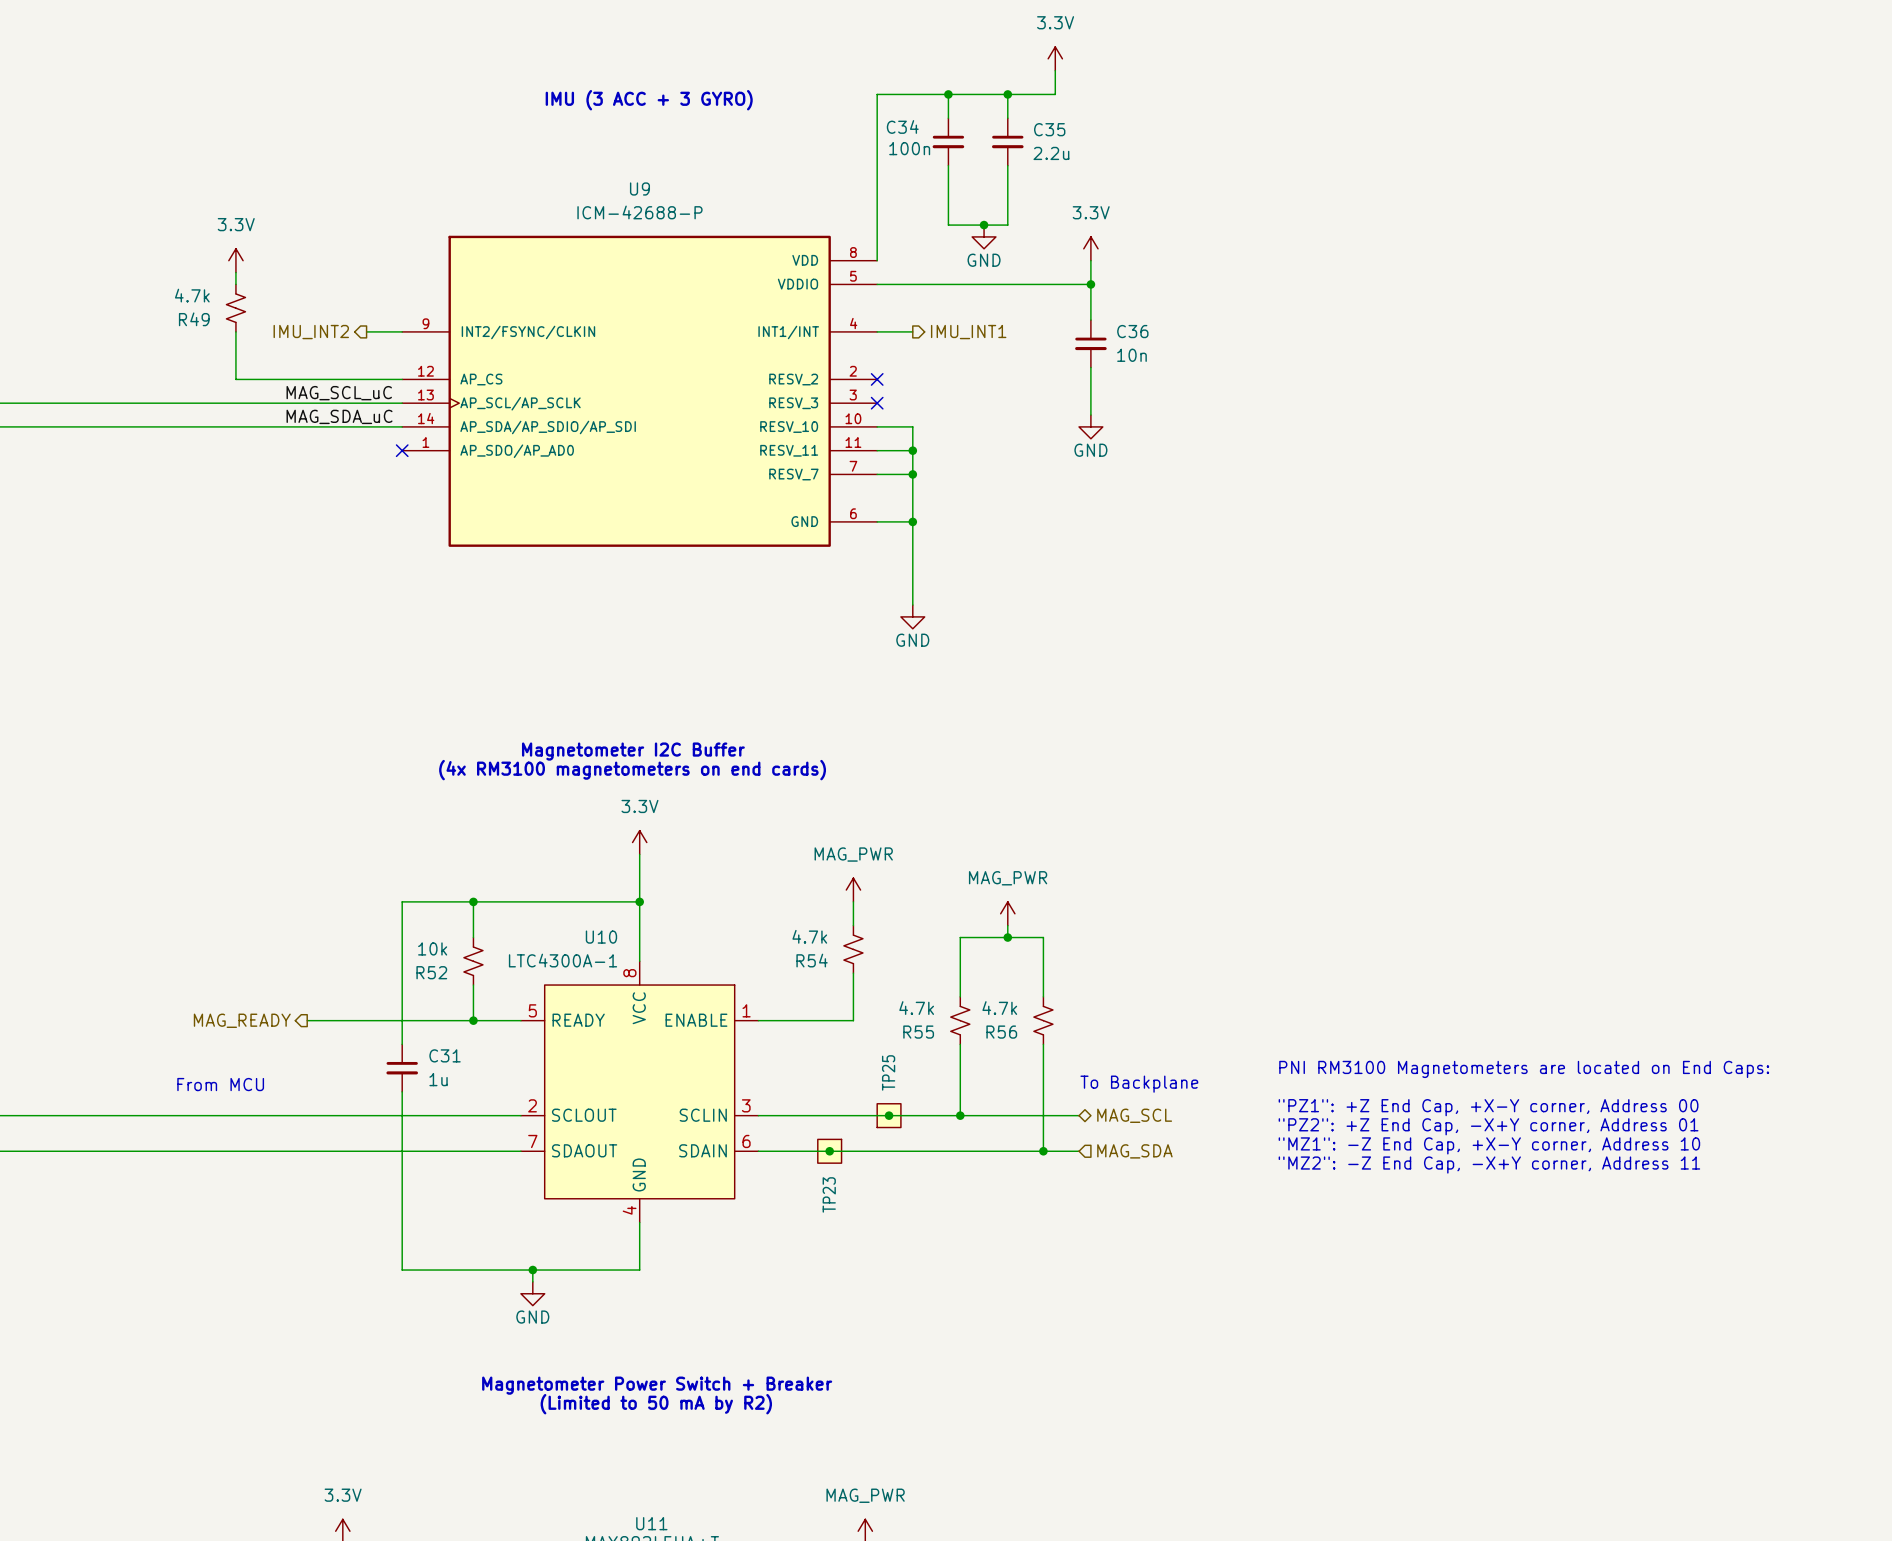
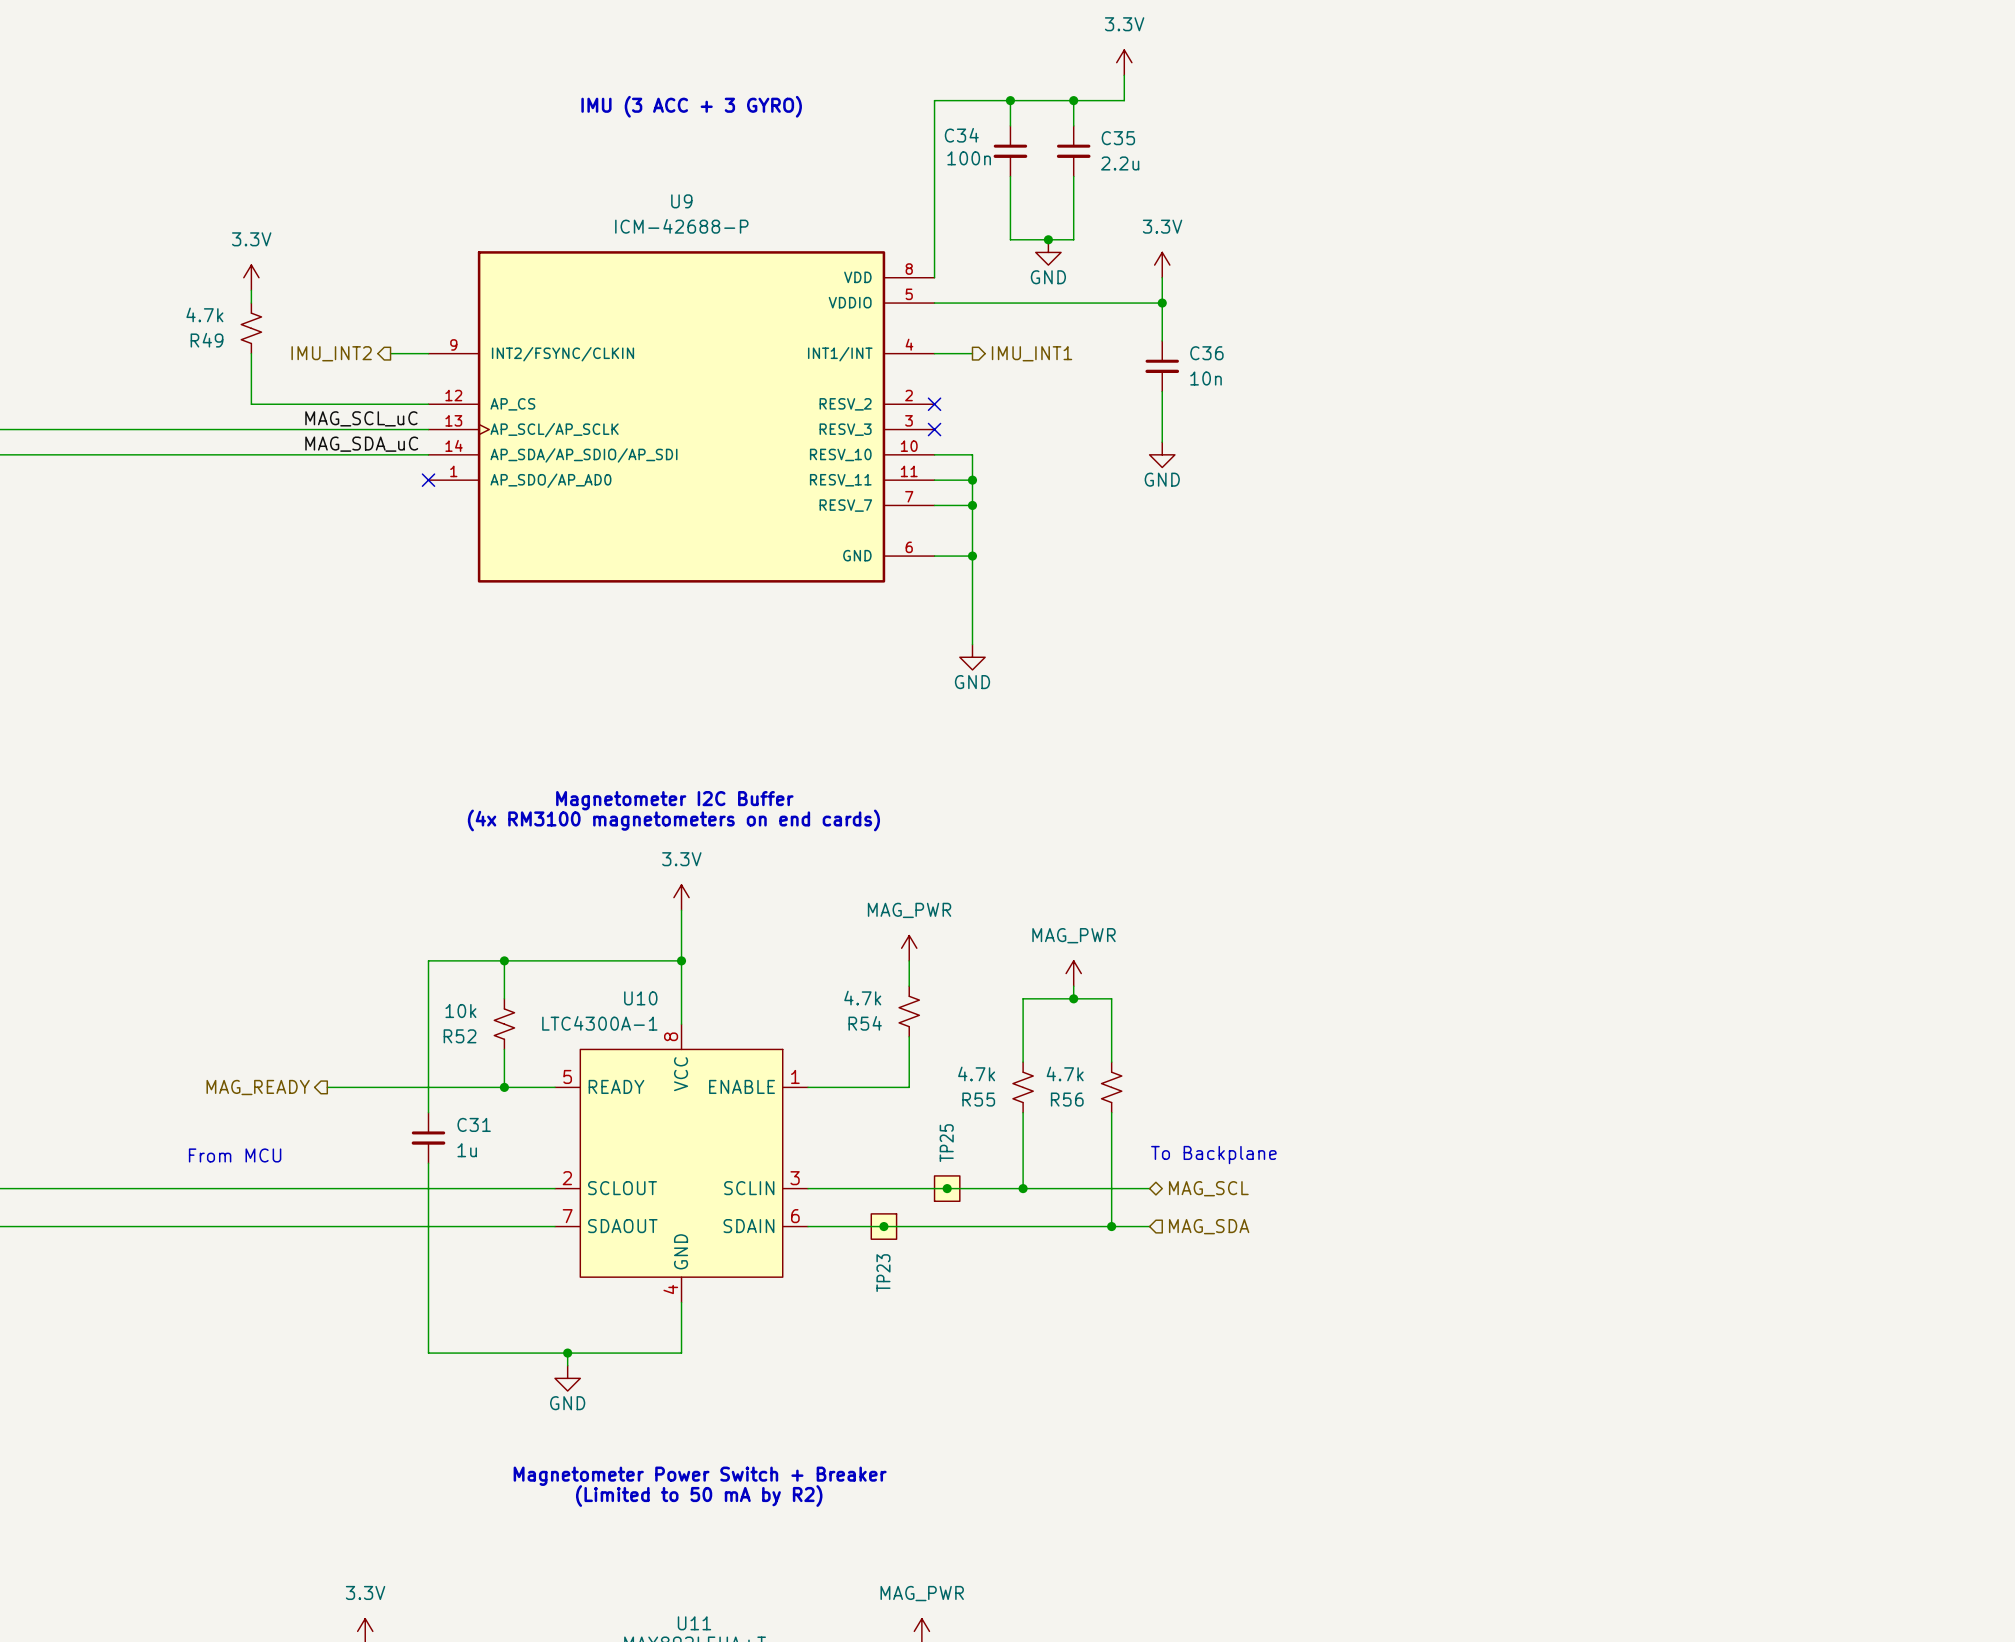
text: PNI RM3100 Magnetometers are located on End Caps: (1524, 1069) -> none
text: "PZ1": +Z End Cap, +X-Y corner, Address 00 (1488, 1107) -> none
text: "PZ2": +Z End Cap, -X+Y corner, Address 01 (1488, 1126) -> none
text: "MZ1": -Z End Cap, +X-Y corner, Address 10 (1489, 1145) -> none
text: "MZ2": -Z End Cap, -X+Y corner, Address 11 (1489, 1165) -> none

